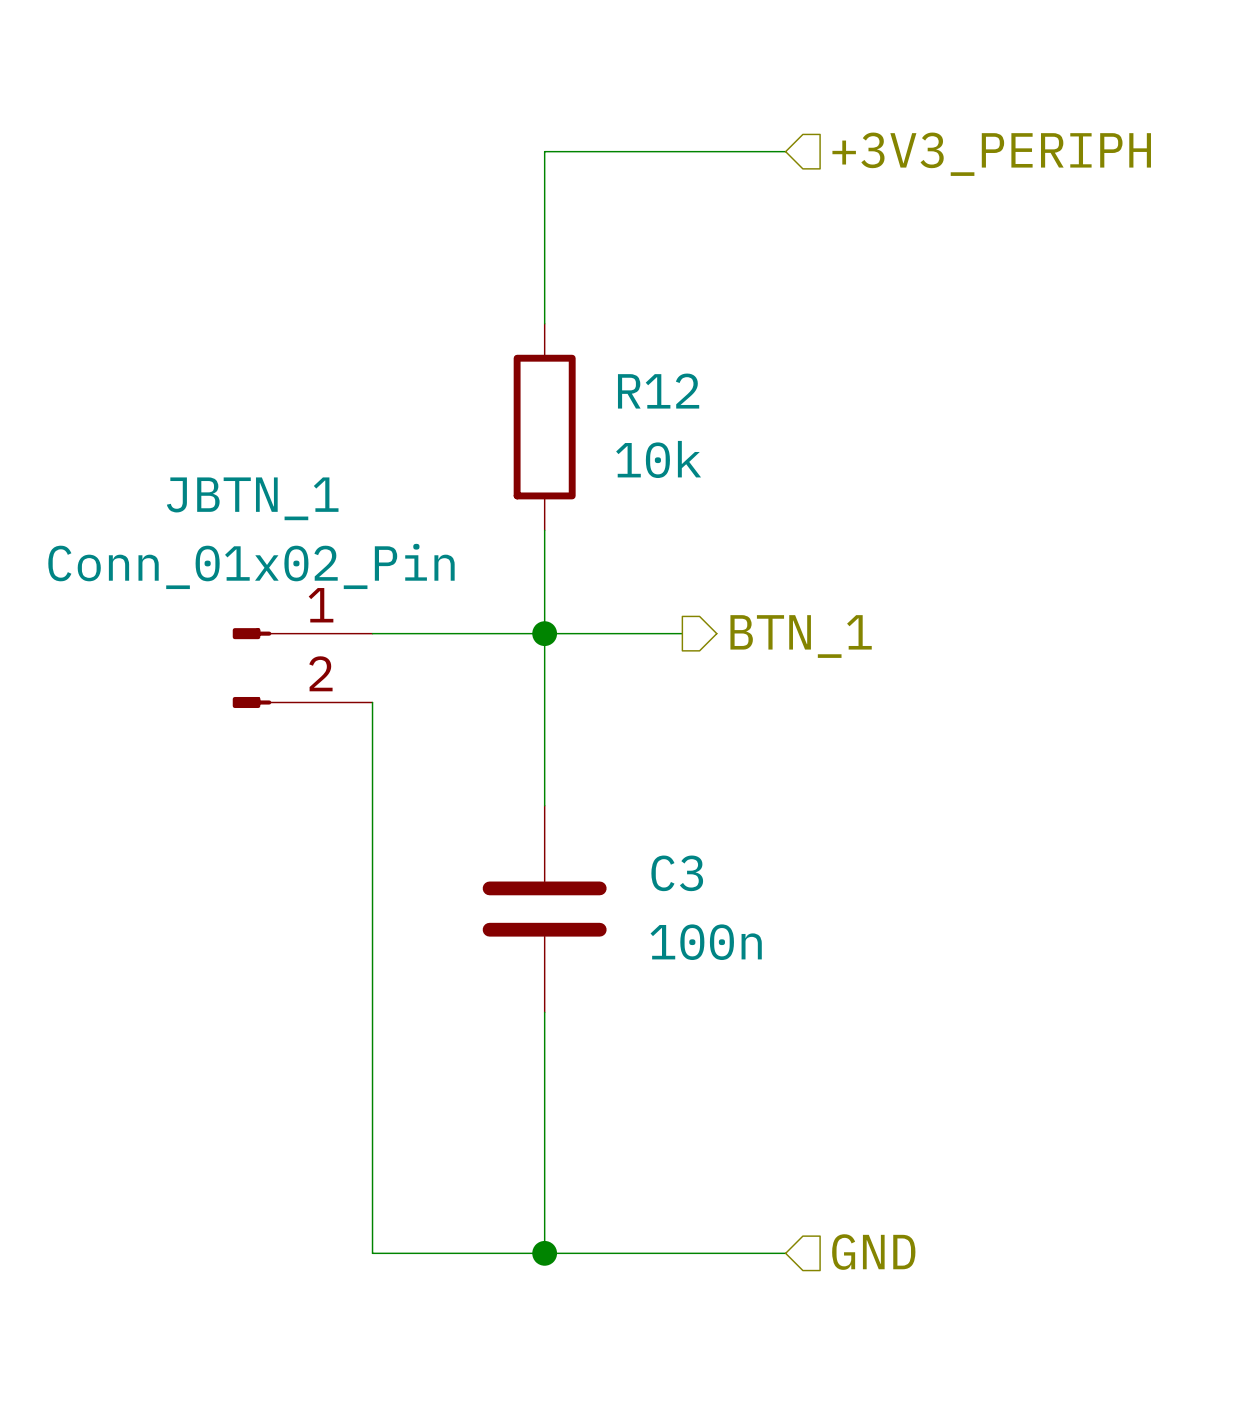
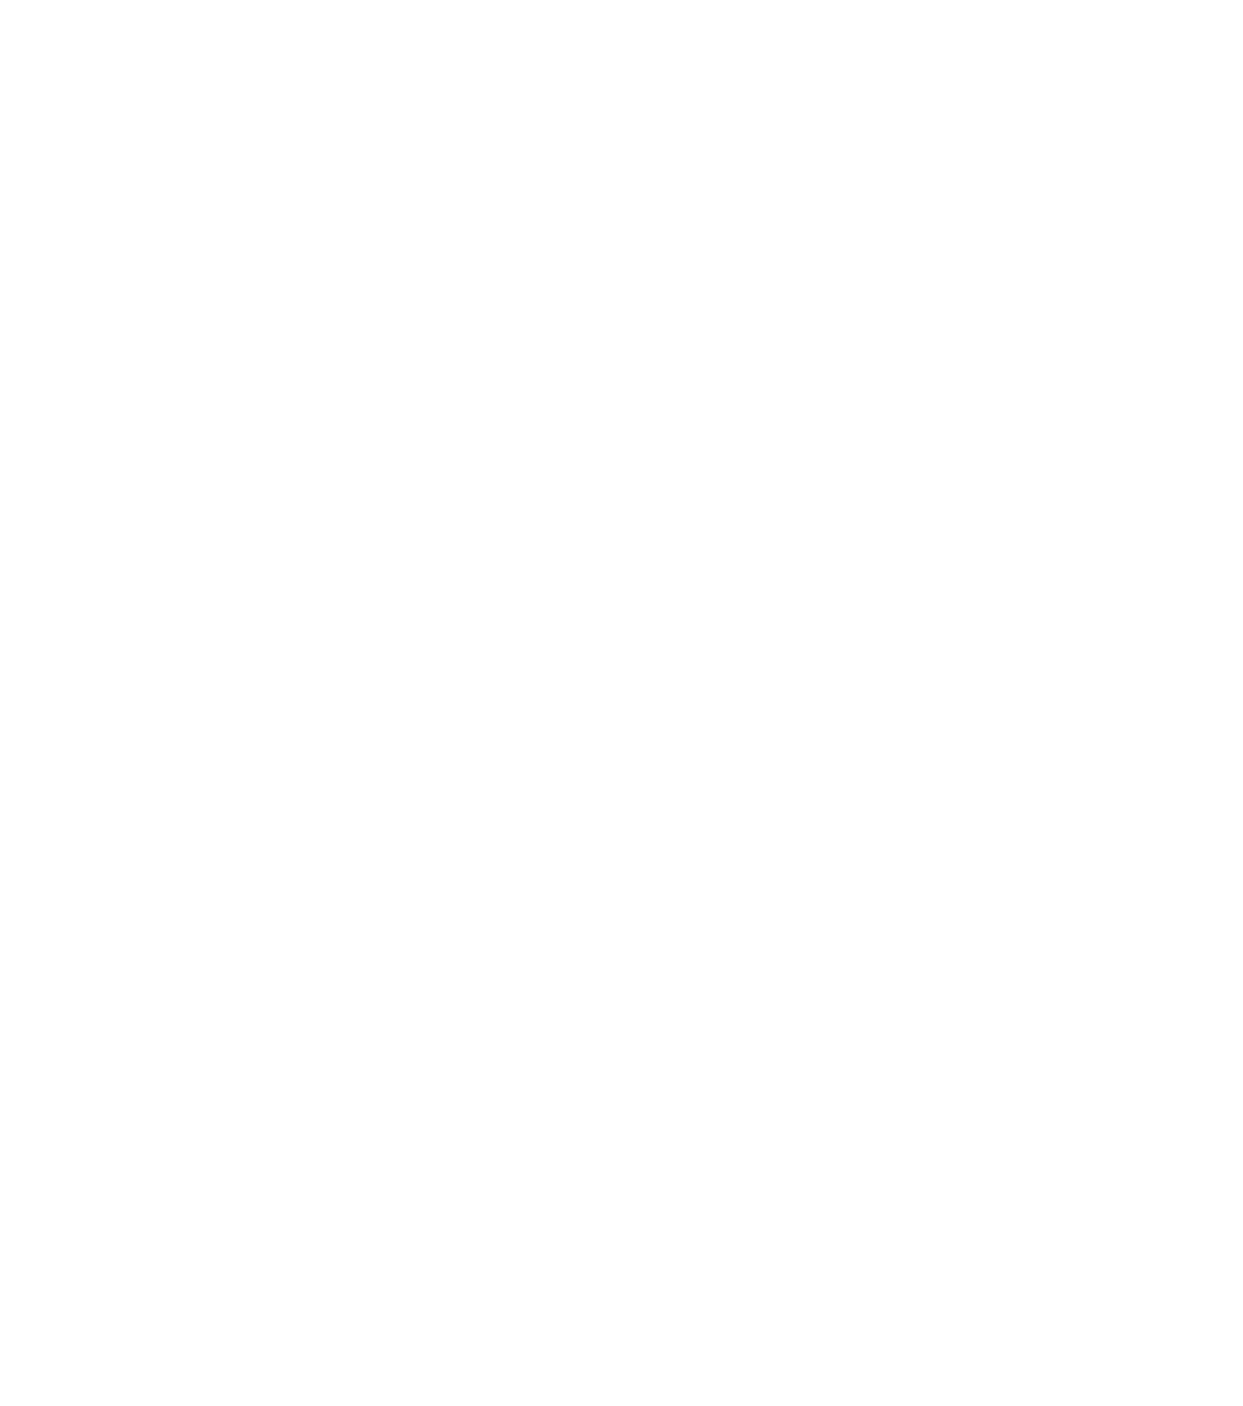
wire: (785, 151) (544, 151) (544, 323) -> none
hierarchical label: +3V3_PERIPH (991, 154) -> none
R12: 10k (544, 427) -> none
wire: (544, 530) (544, 805) -> none
wire: (372, 633) (682, 633) -> none
junction: (544, 633) -> none
hierarchical label: BTN_1 (801, 636) -> none
JBTN_1: Conn_01x02_Pin (302, 668) -> none
wire: (372, 702) (372, 1253) (785, 1253) -> none
C3: 100n (544, 909) -> none
wire: (544, 1012) (544, 1253) -> none
hierarchical label: GND (873, 1252) -> none
junction: (544, 1253) -> none

